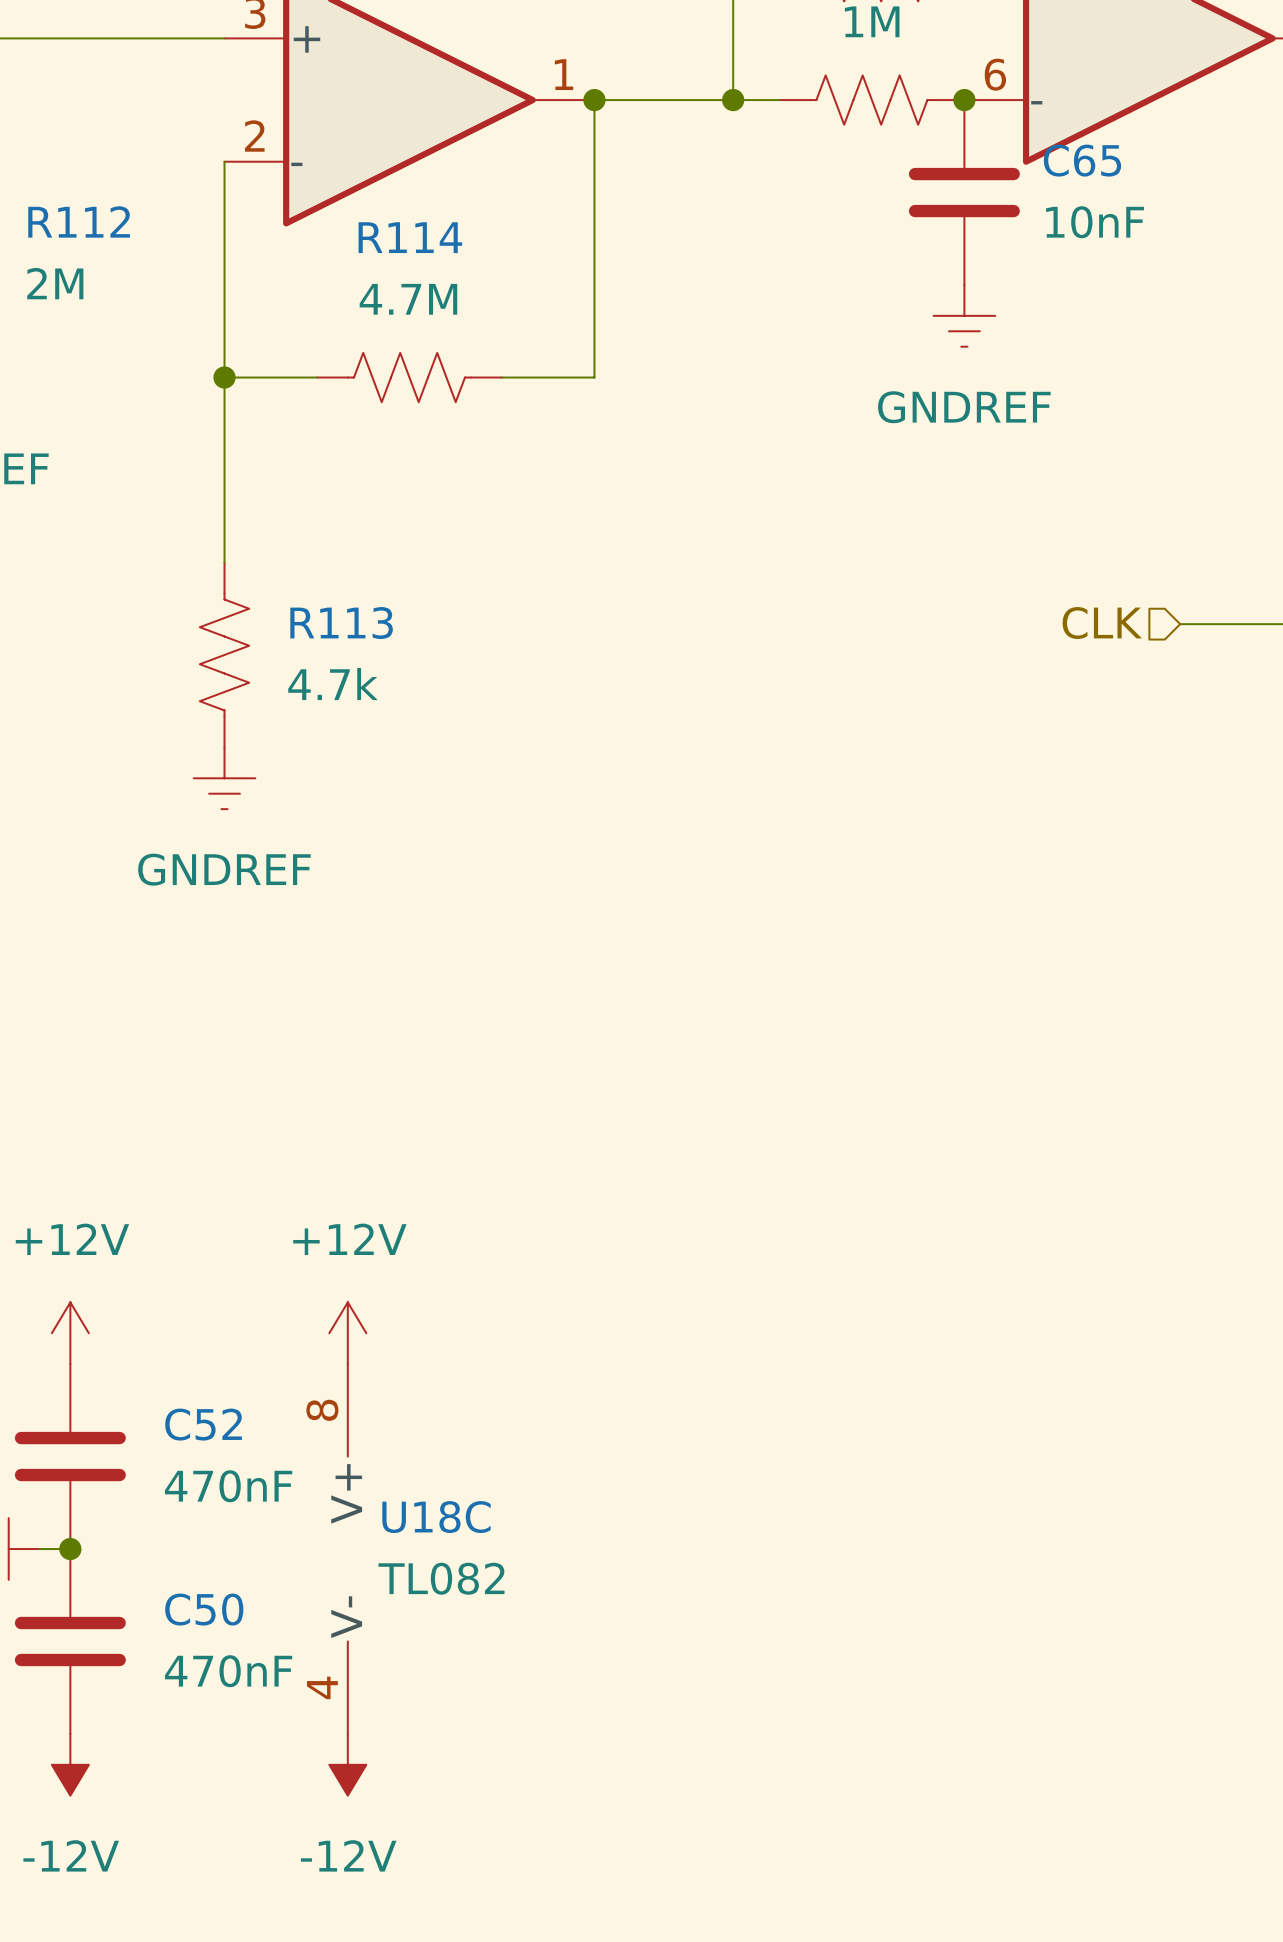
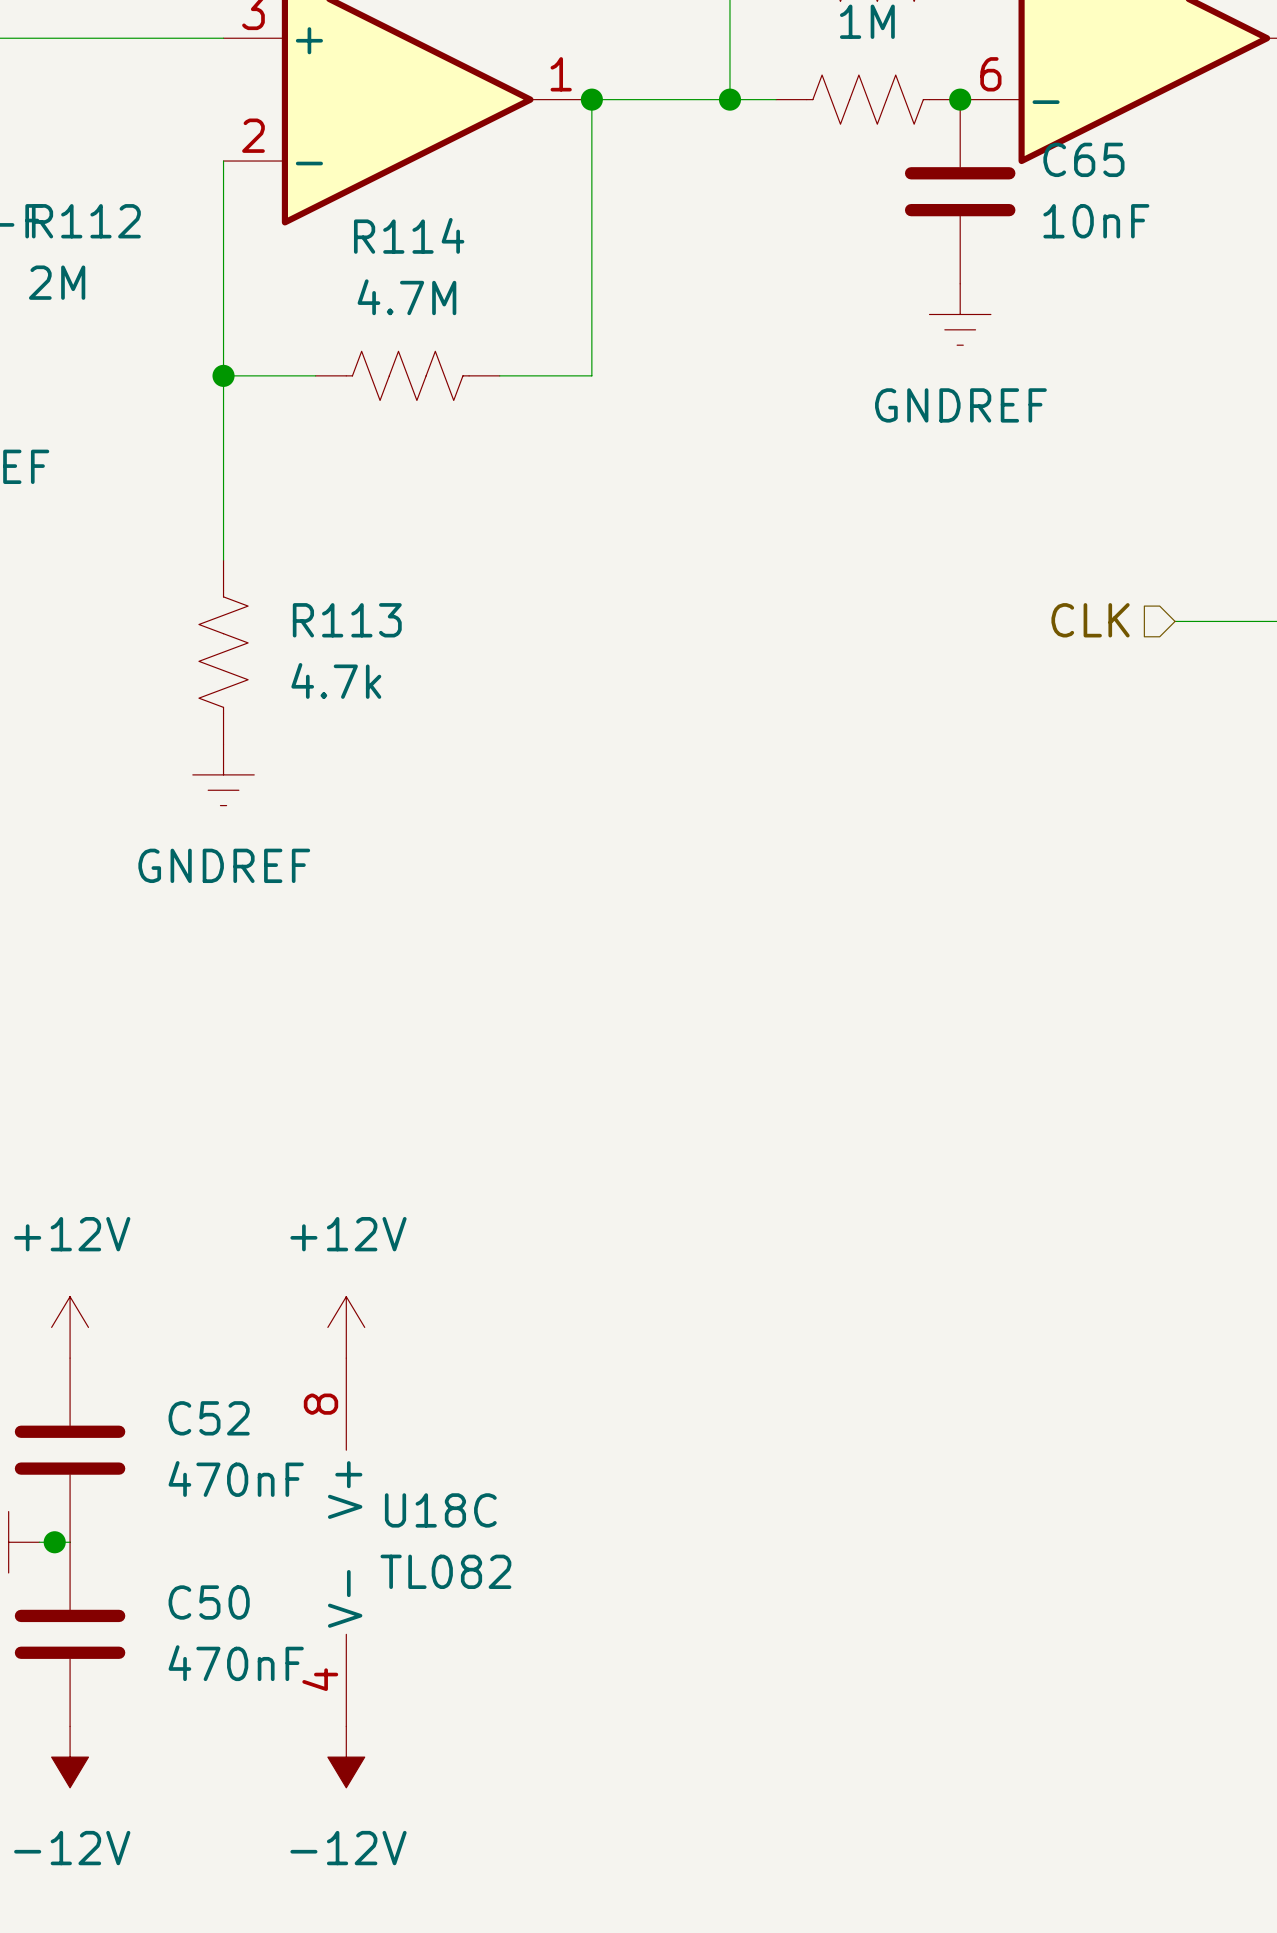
junction position: (70, 1549) -> (54, 1542)

